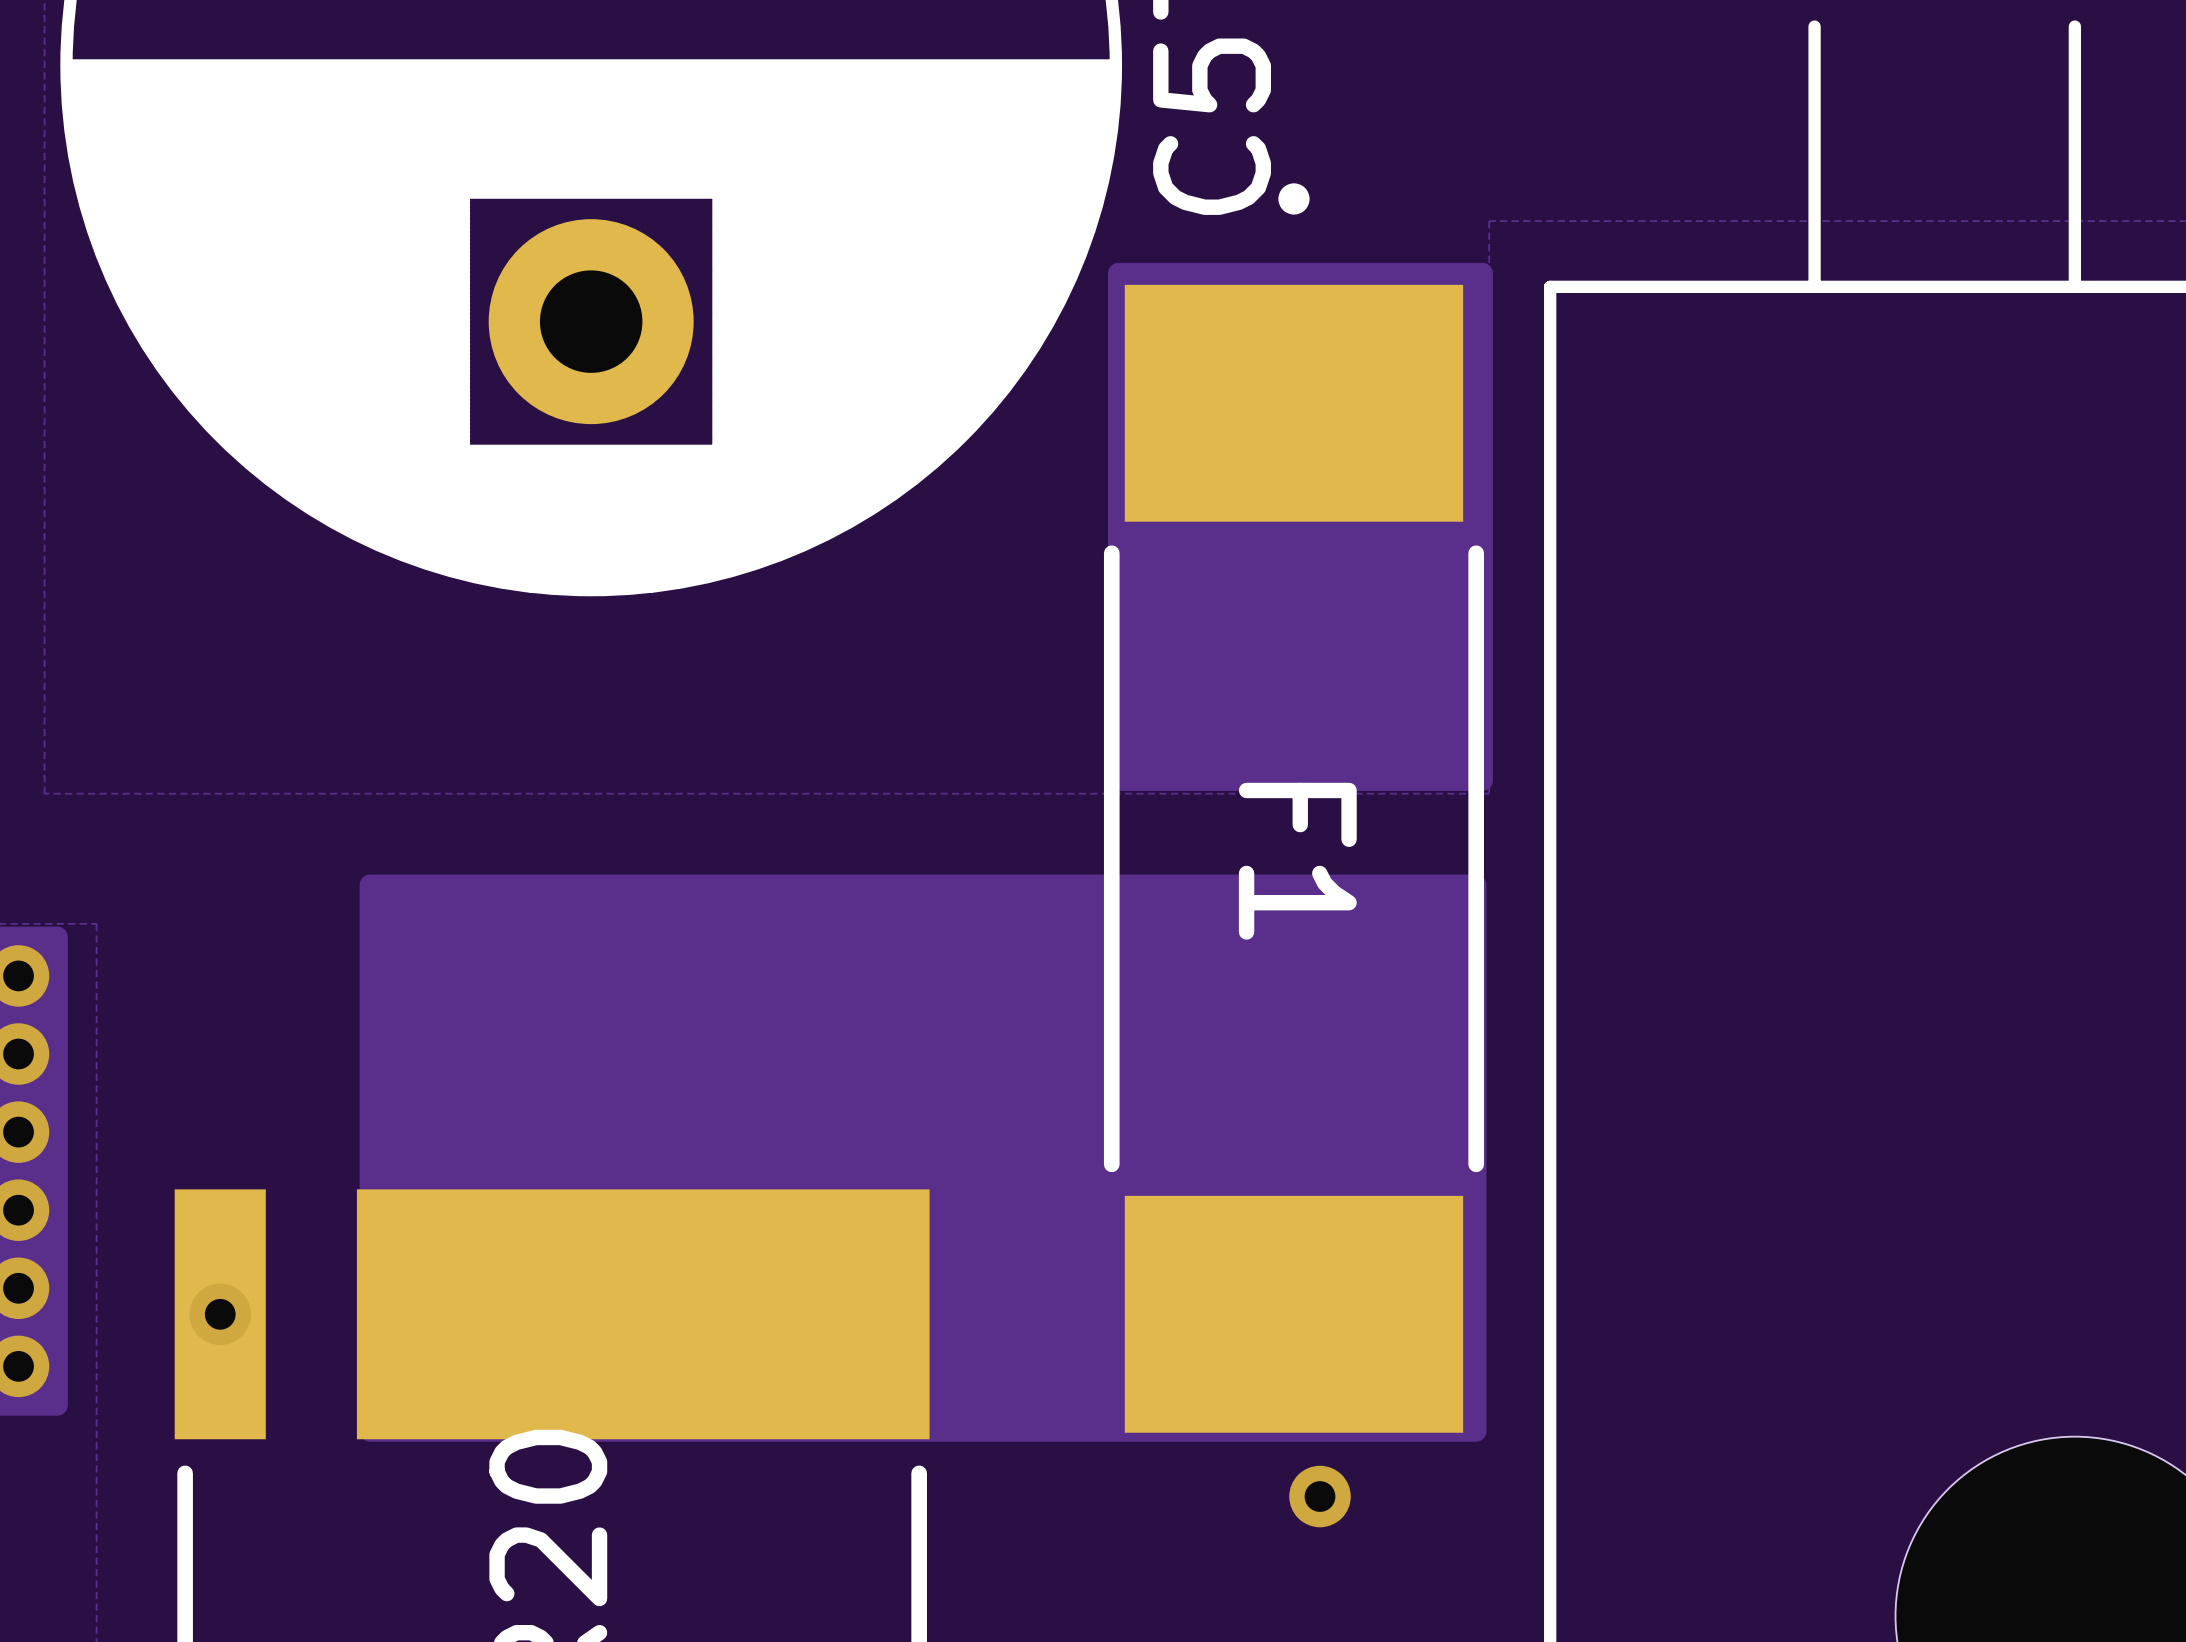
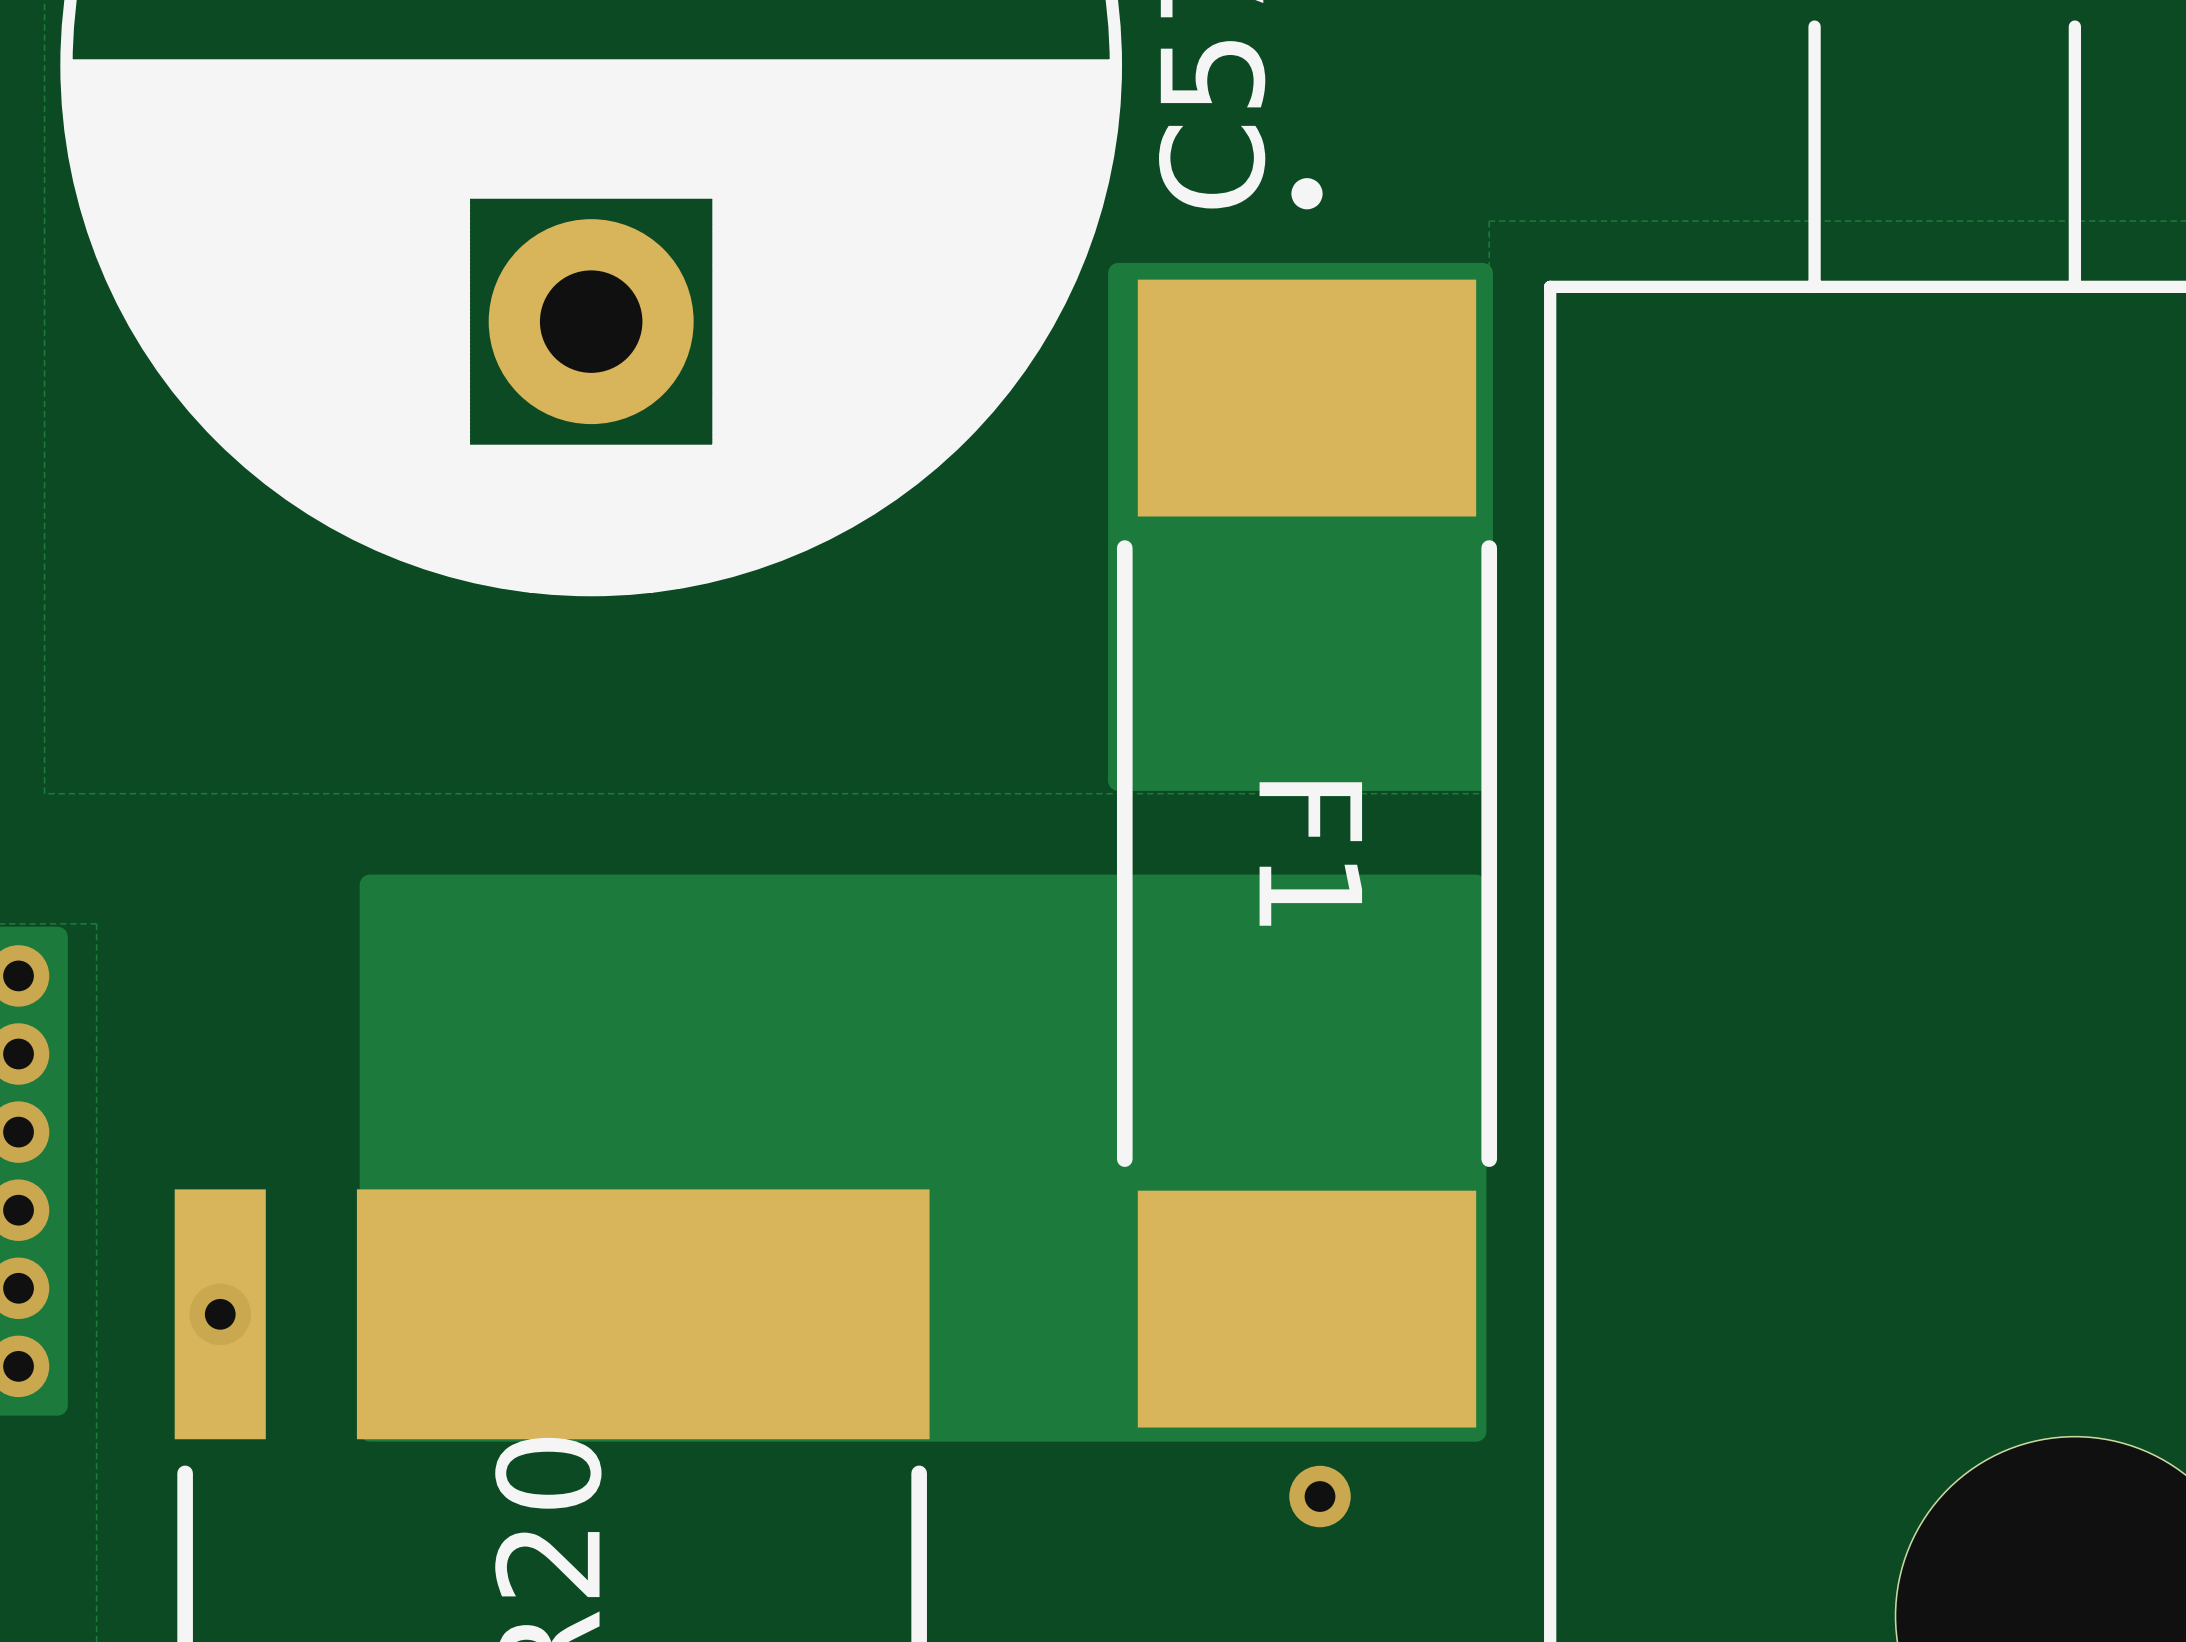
F1 position: (1293, 808) -> (1306, 802)

